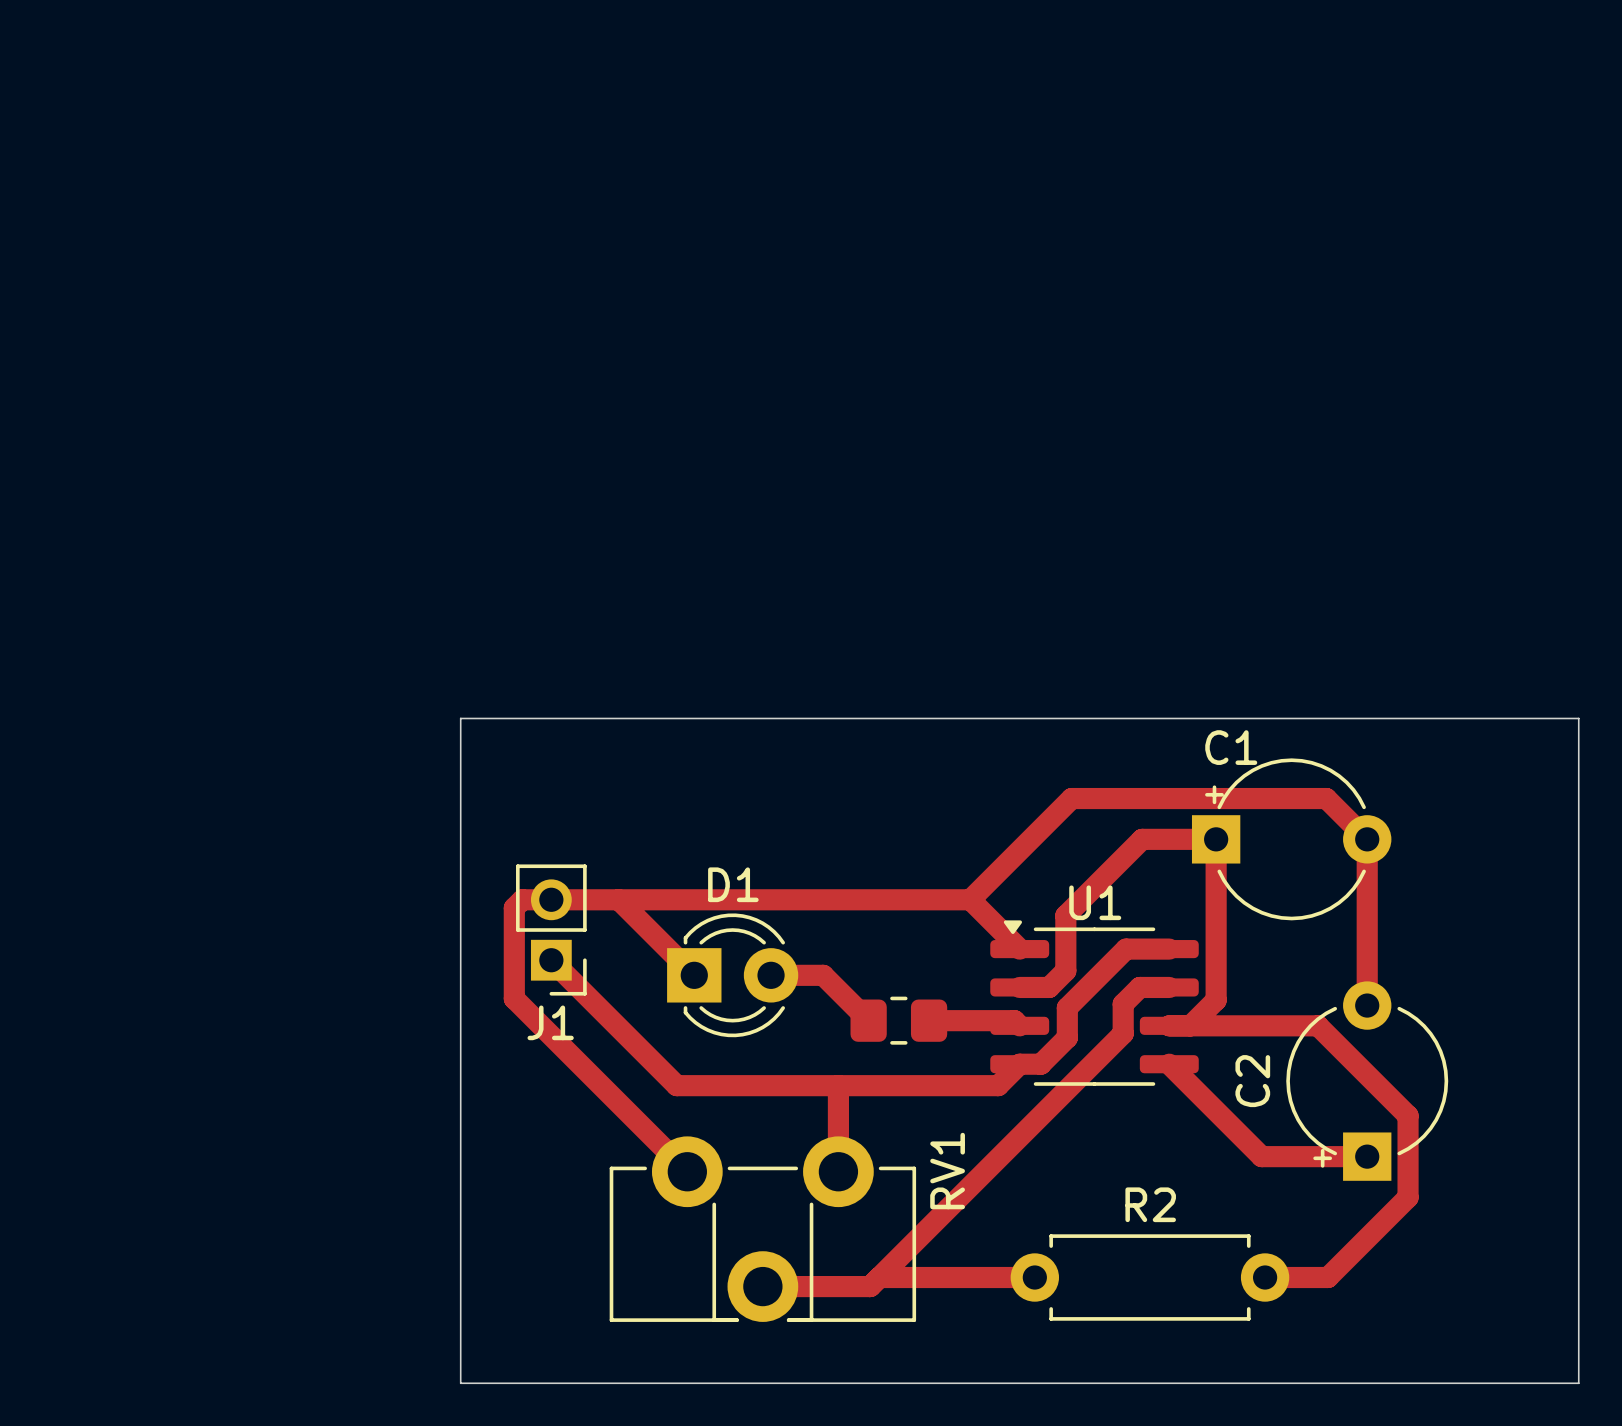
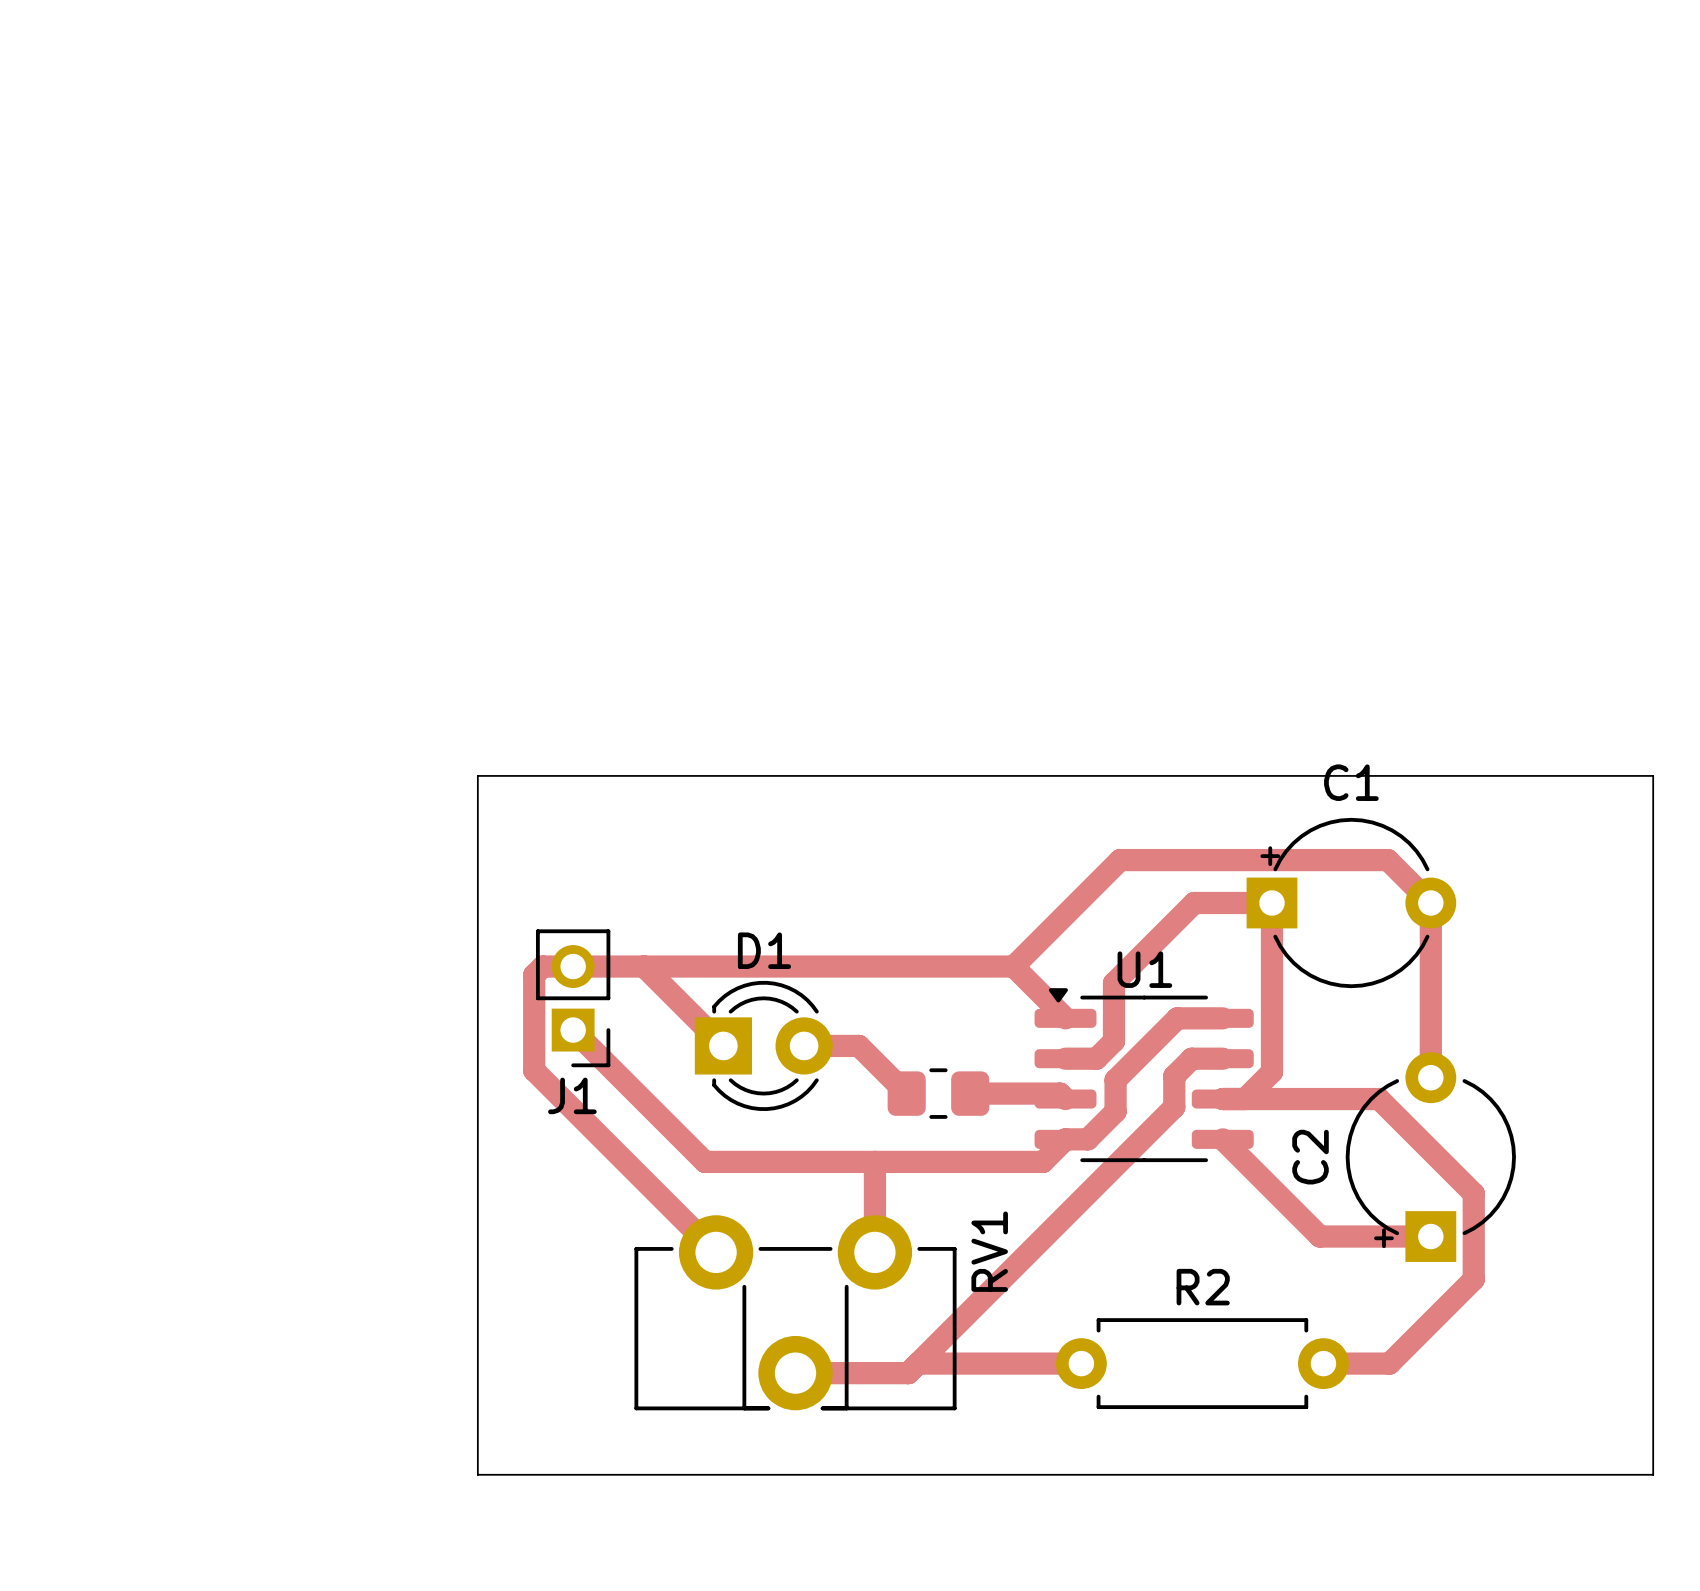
C1 name position: C1 (1231, 747) -> C1 (1351, 782)

